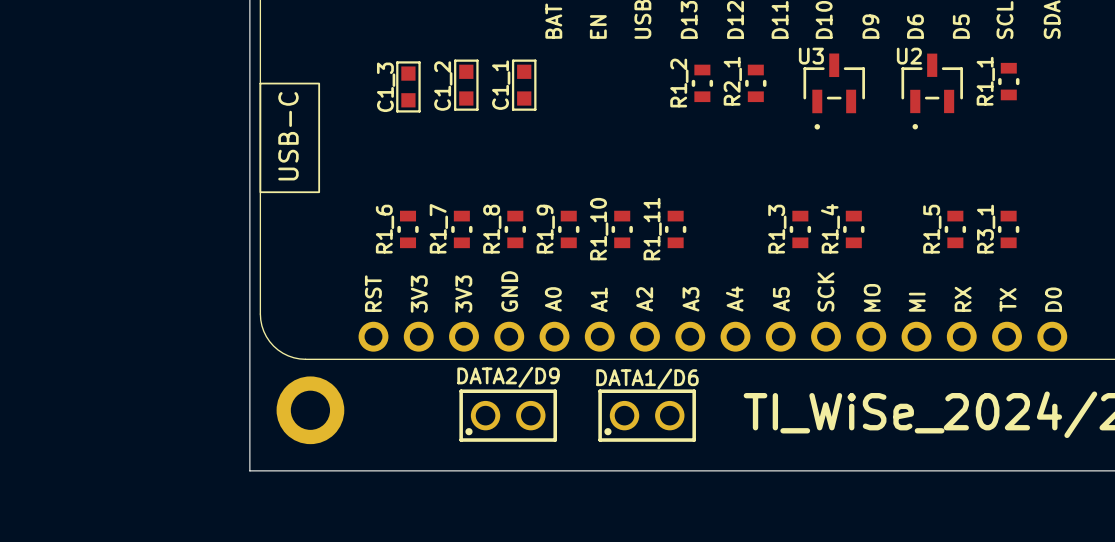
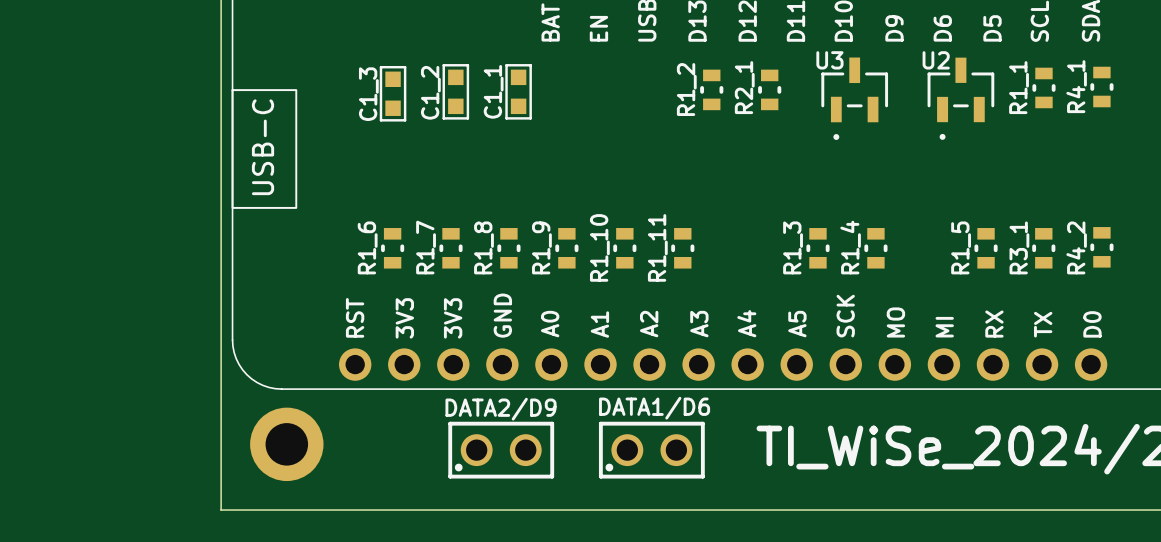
R4_1: none -> (1101, 87)
R4_2: none -> (1101, 247)
text: none -> DATA1/D6 (654, 408)
text: none -> DATA2/D9 (501, 409)
DATA2/D9 name: DATA2/D9 (508, 377) -> none
DATA1/D6 name: DATA1/D6 (647, 379) -> none

